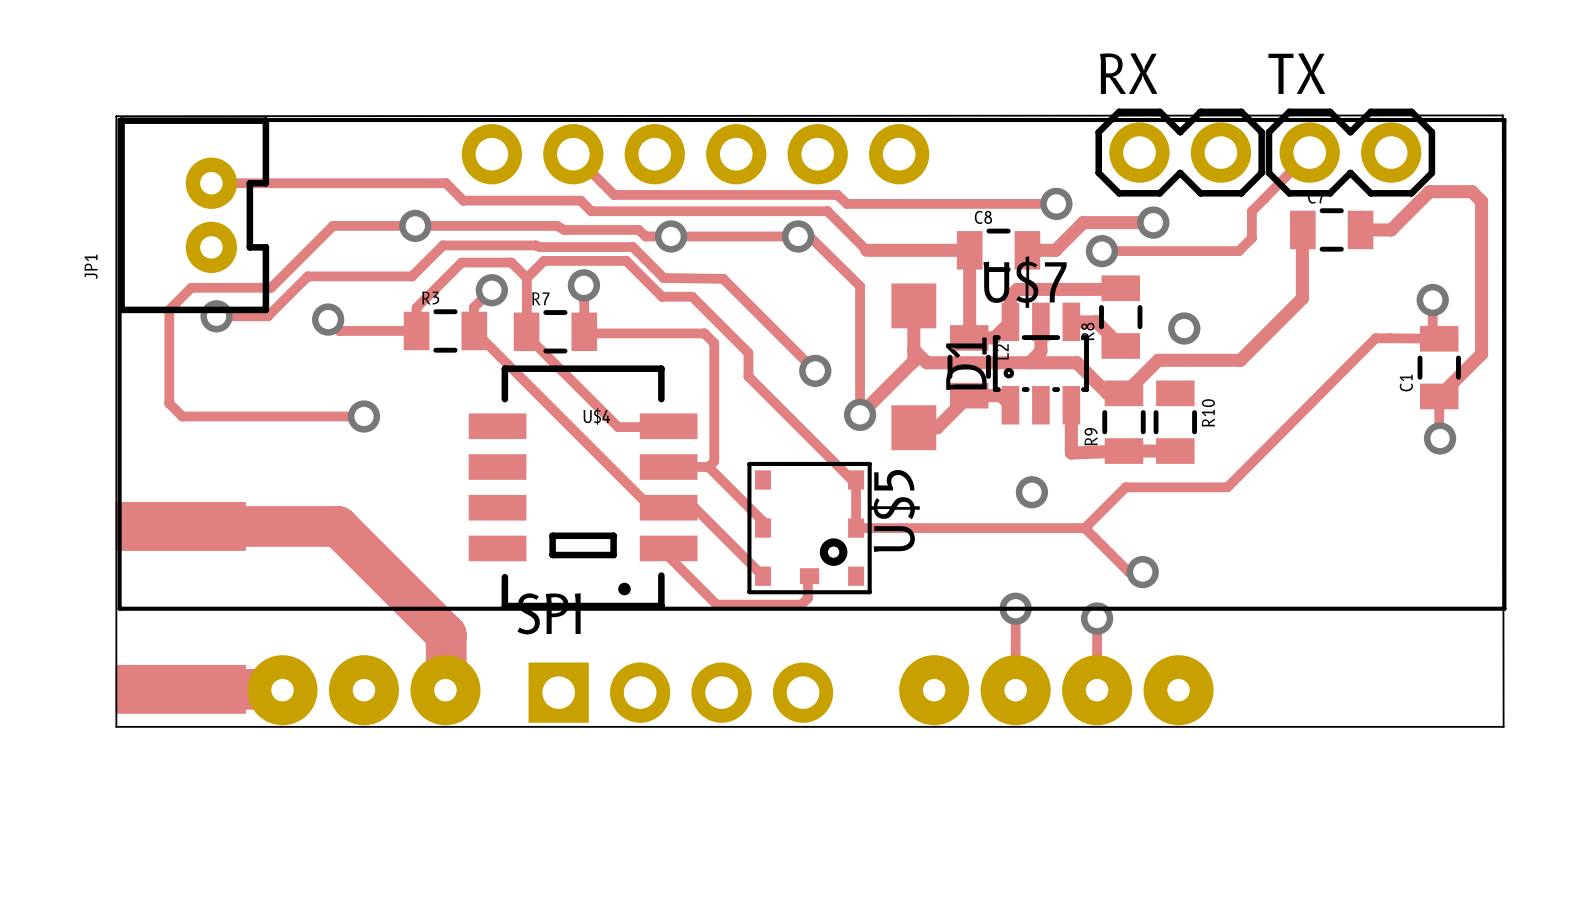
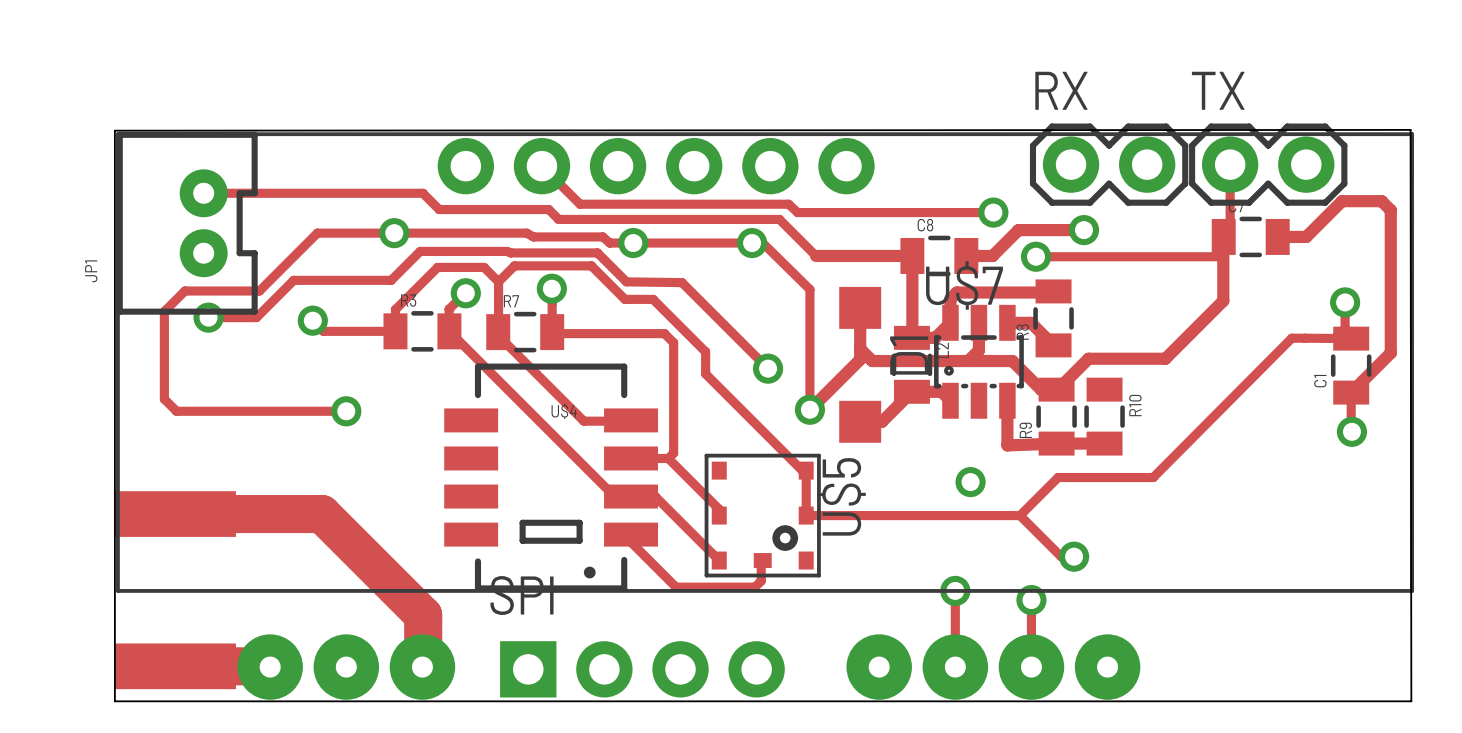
track: (1309, 152) (1251, 211) (1251, 238) (1238, 251) -> (1230, 164) (1230, 245) (1218, 256) (1163, 256)
via: (1184, 328) -> none

